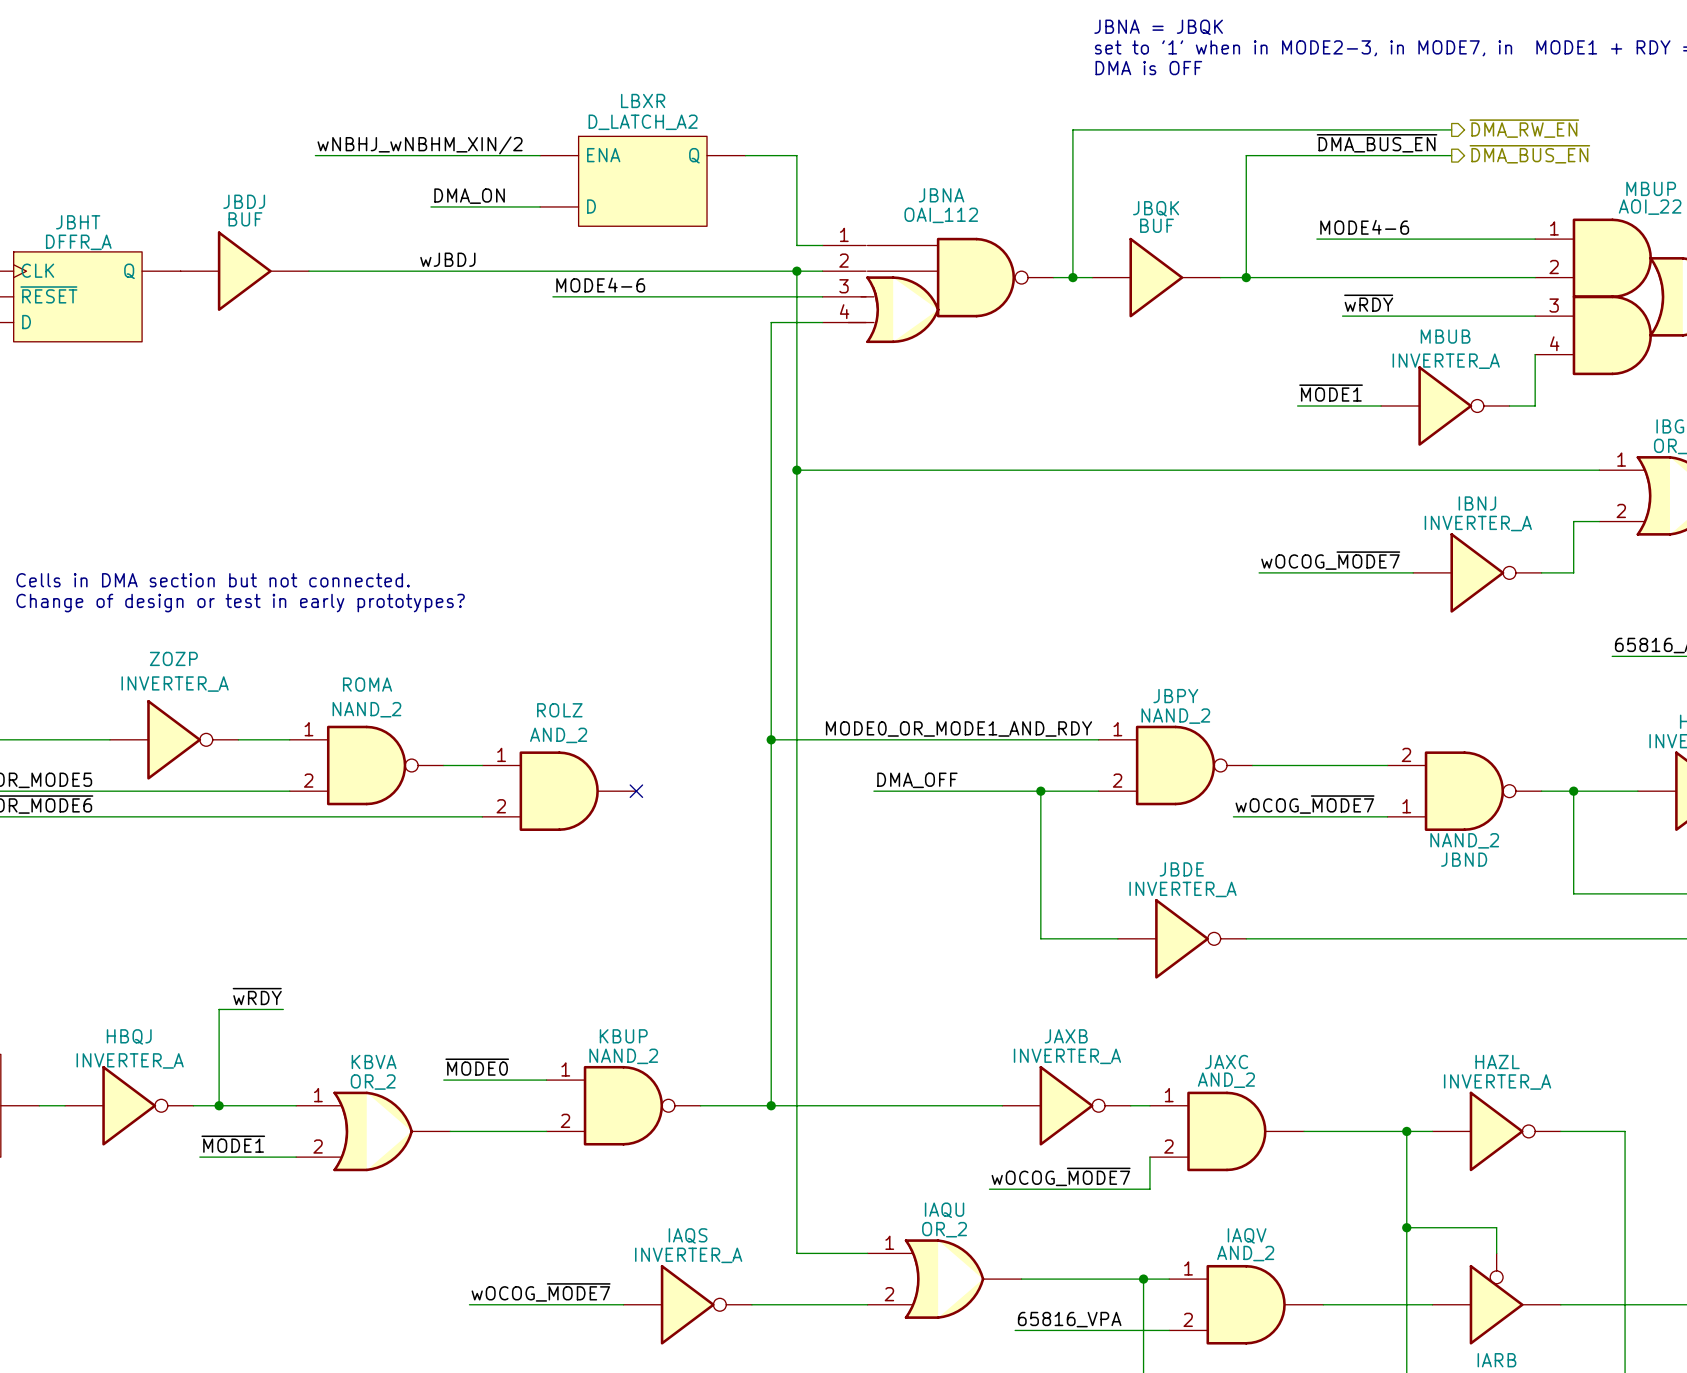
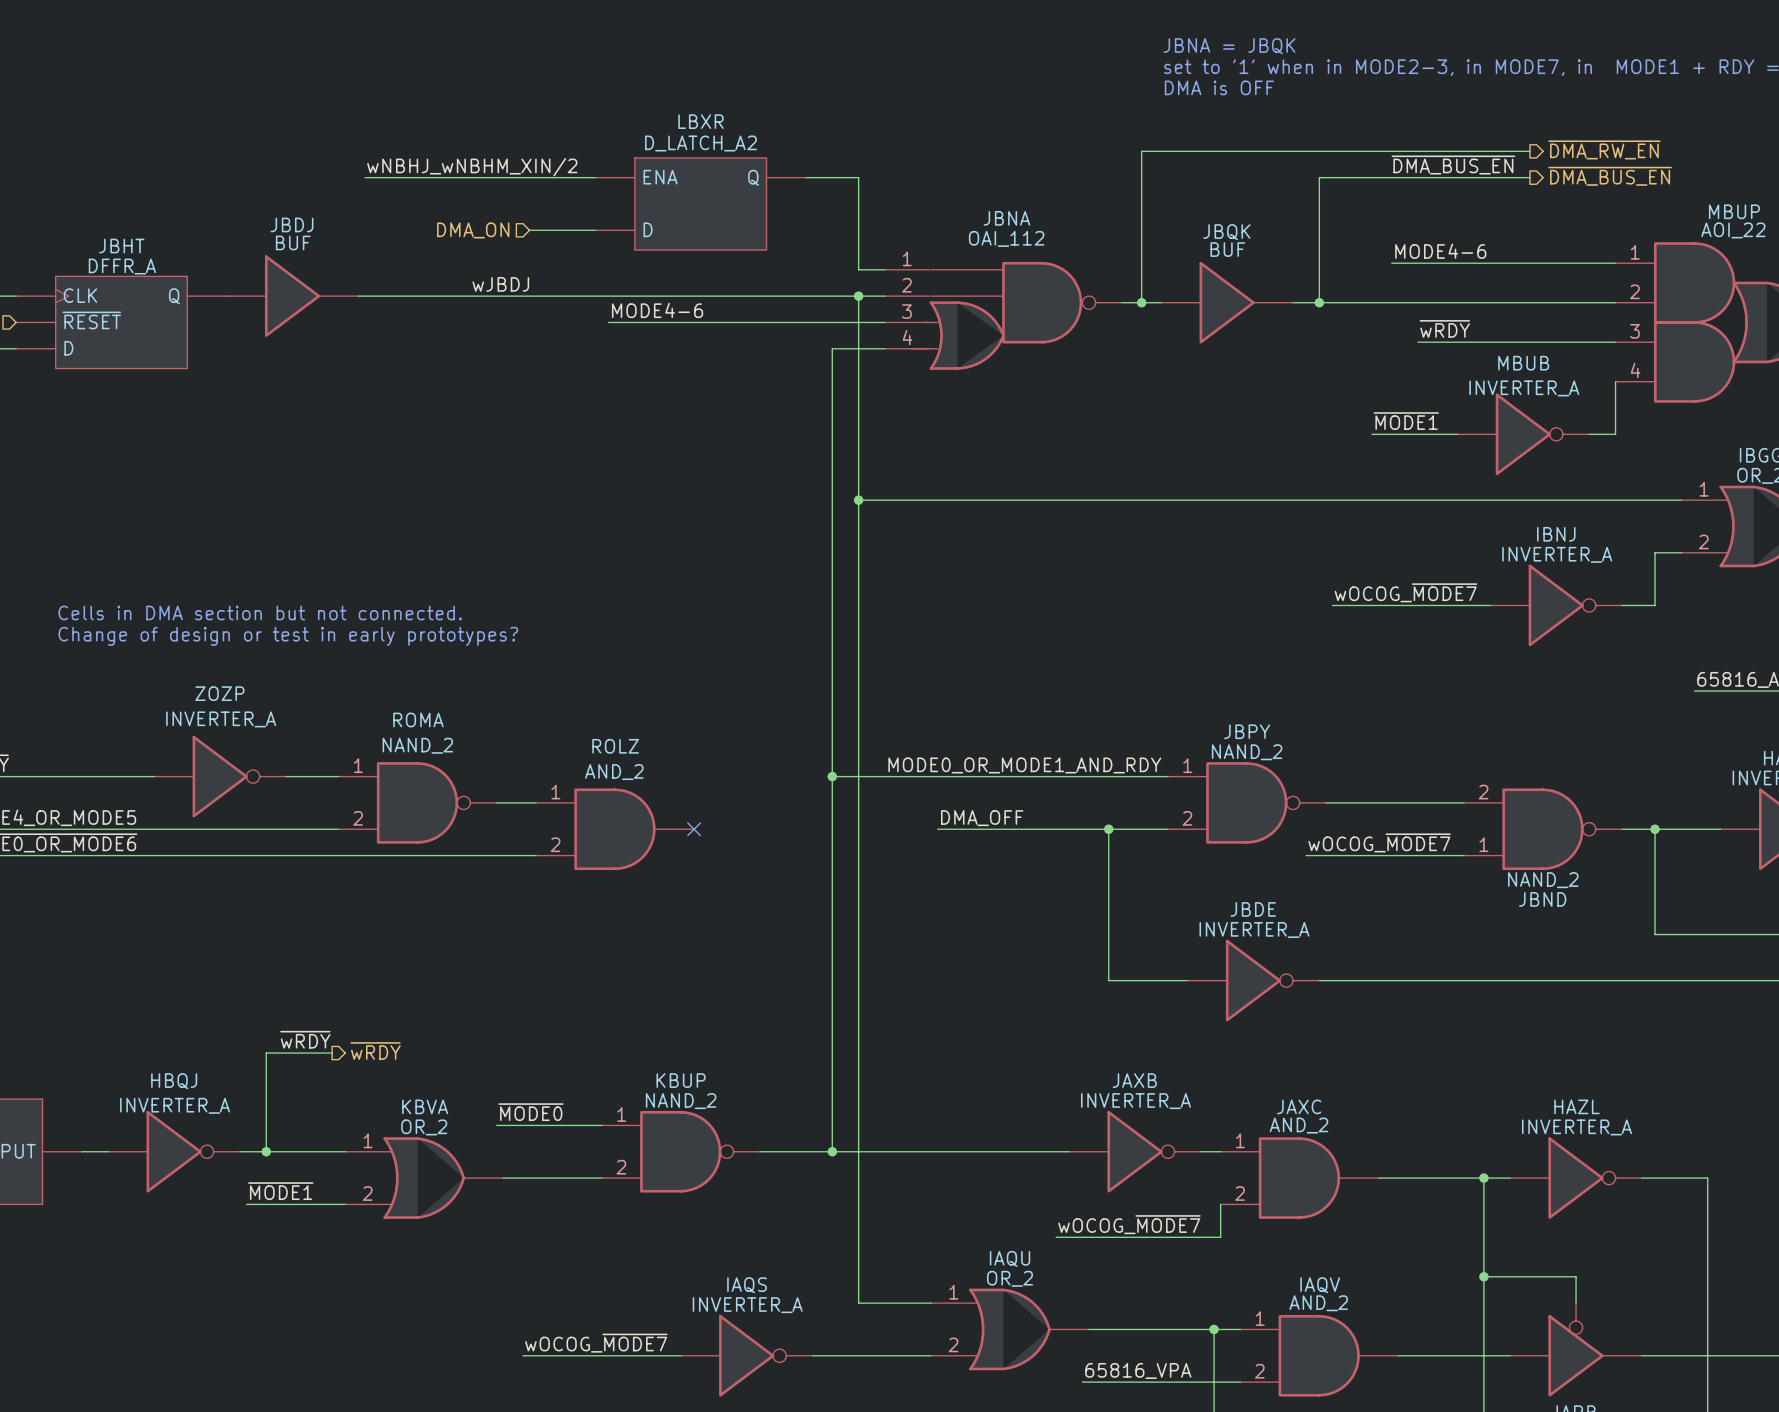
label: DMA_ON (469, 196) -> none
wire: (430, 206) (475, 206) -> none
hierarchical label: none -> DMA_ON (473, 230)
hierarchical label: none -> ~{wRDY} (375, 1051)

